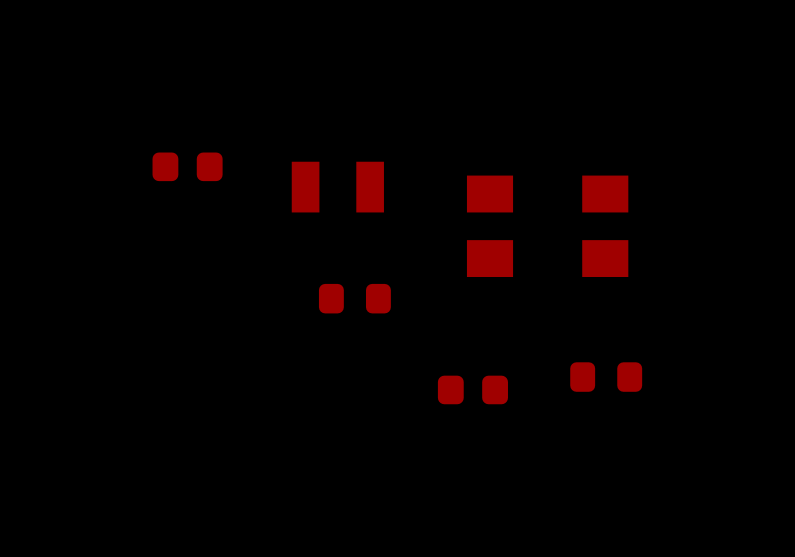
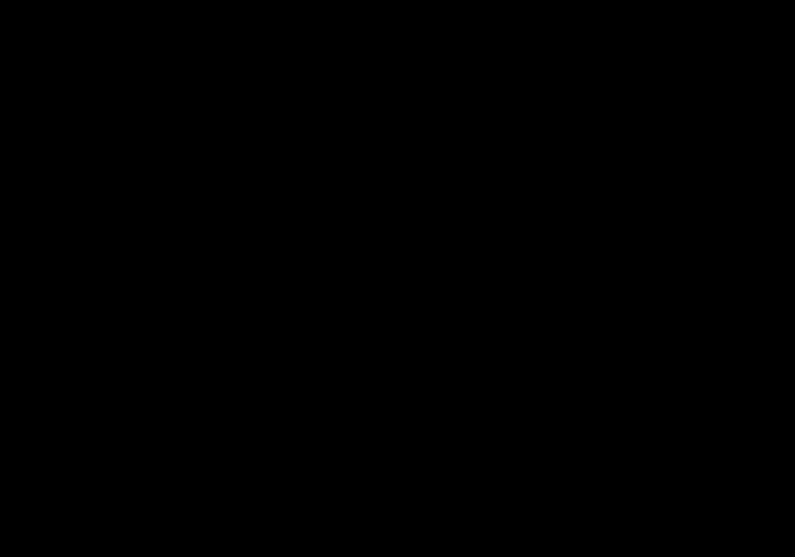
part: (187, 166) -> none
part: (337, 187) -> none
part: (547, 226) -> none
part: (354, 298) -> none
part: (606, 377) -> none
part: (472, 389) -> none

